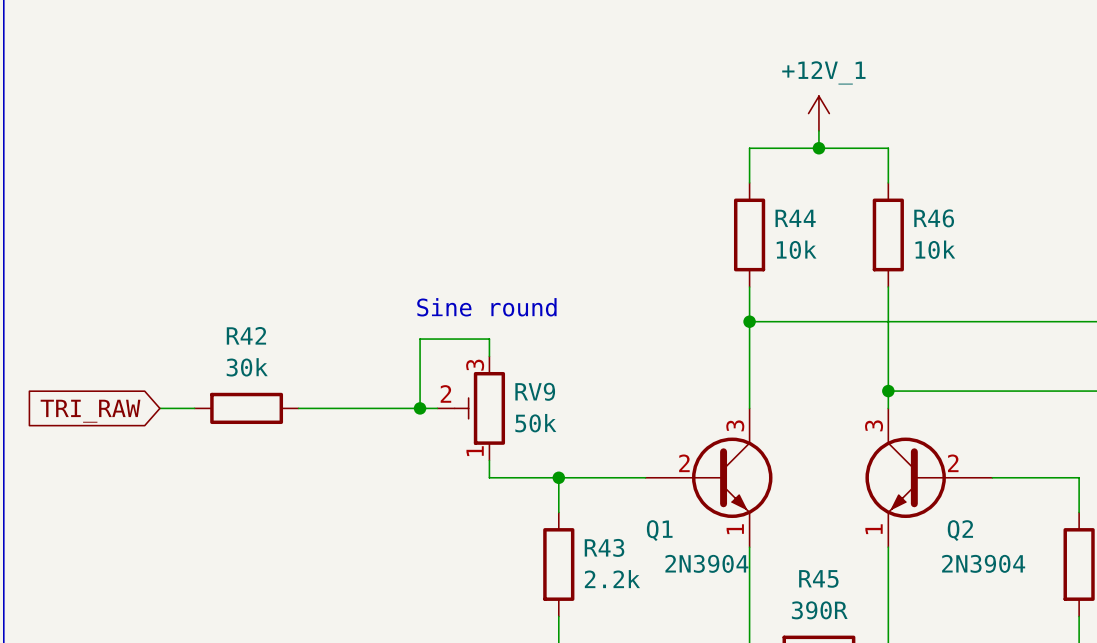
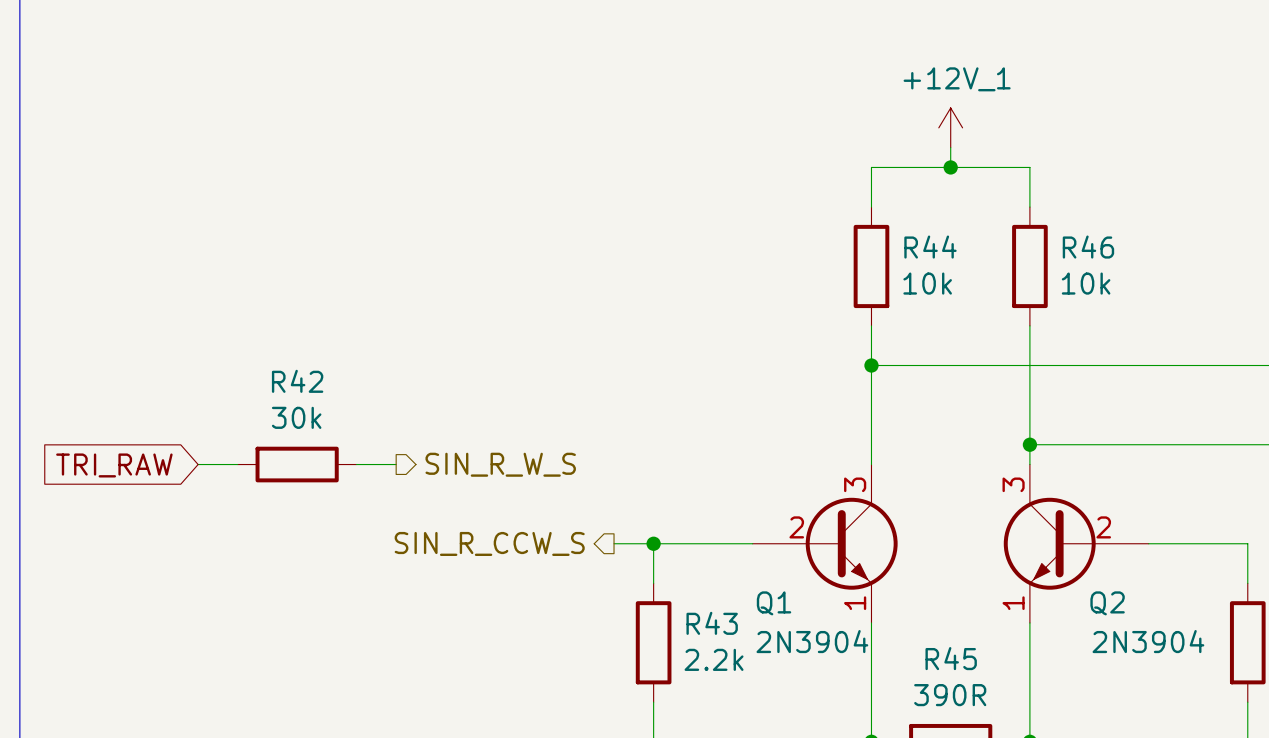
text: Sine round (486, 307) -> none
wire: (489, 356) (489, 339) (420, 339) (420, 408) -> none
wire: (333, 408) (437, 408) -> none
junction: (420, 408) -> none
RV9: 50k (471, 408) -> none
hierarchical label: none -> SIN_R_W_S (500, 464)
wire: (489, 460) (489, 477) (524, 477) -> none
hierarchical label: none -> SIN_R_CCW_S (489, 543)

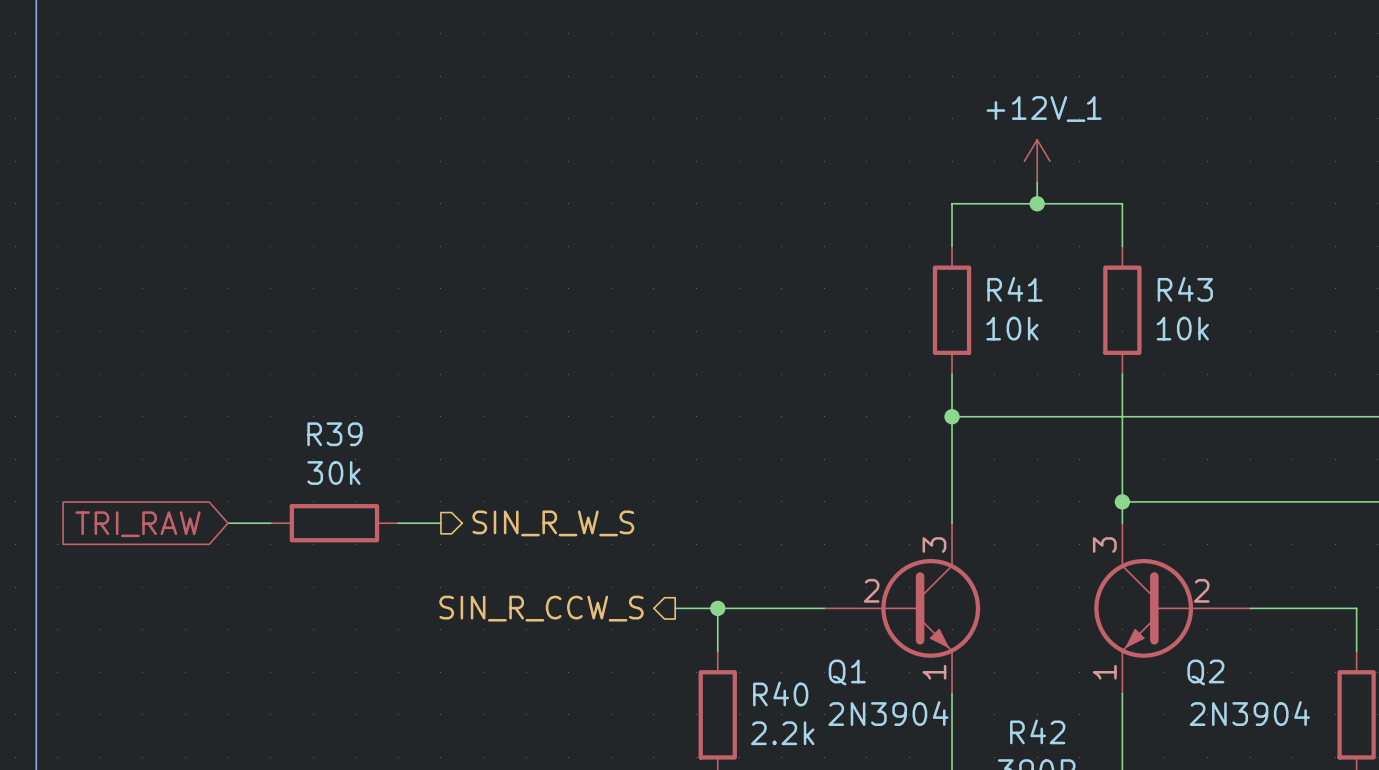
R44 name: R44 (930, 247) -> R41 (1014, 289)
R46 name: R46 (1088, 247) -> R43 (1185, 289)
R42 name: R42 (297, 381) -> R39 (334, 434)
R43 name: R43 (712, 623) -> R40 (780, 693)
R45 name: R45 (951, 658) -> R42 (1037, 731)

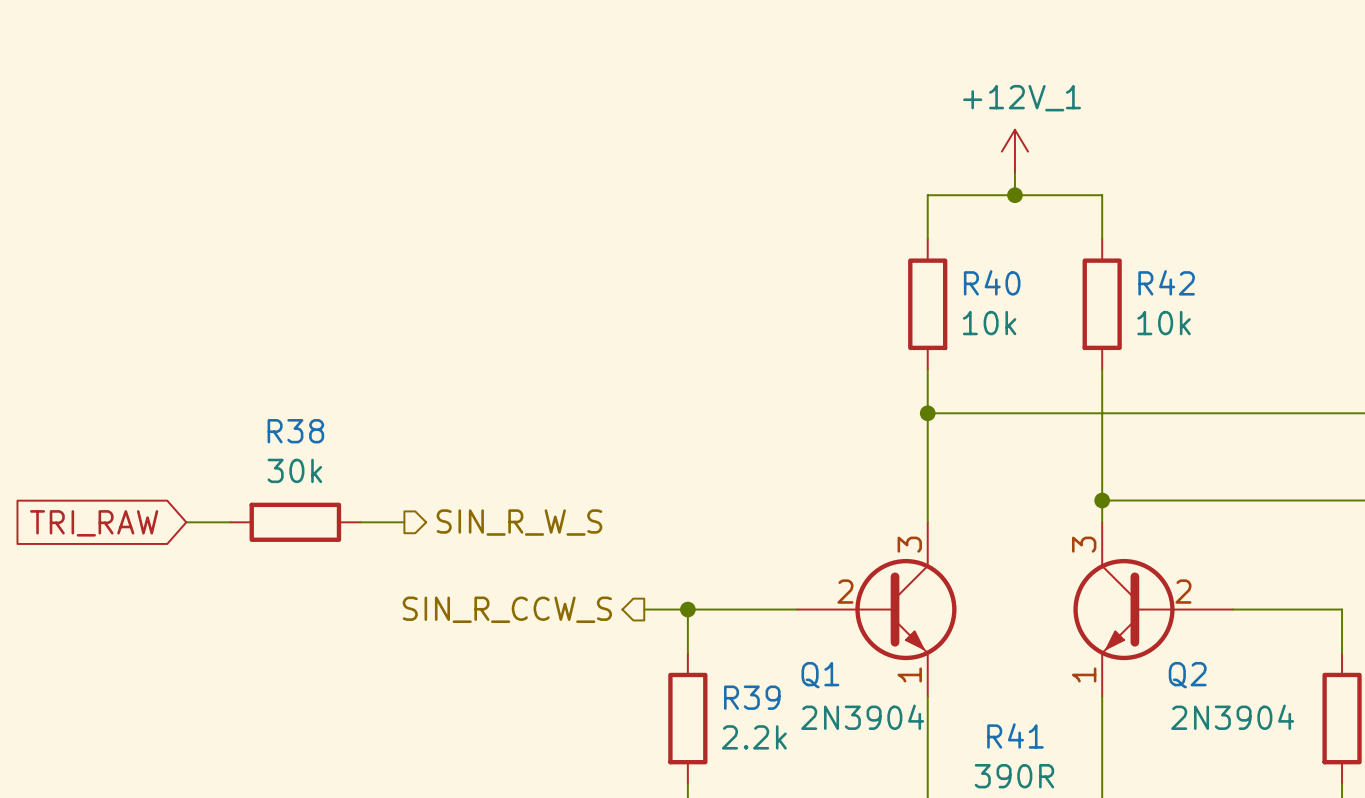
R41 name: R41 (1014, 289) -> R40 (992, 282)
R43 name: R43 (1185, 289) -> R42 (1166, 282)
R39 name: R39 (334, 434) -> R38 (295, 431)
R40 name: R40 (780, 693) -> R39 (752, 697)
R42 name: R42 (1037, 731) -> R41 (1015, 735)

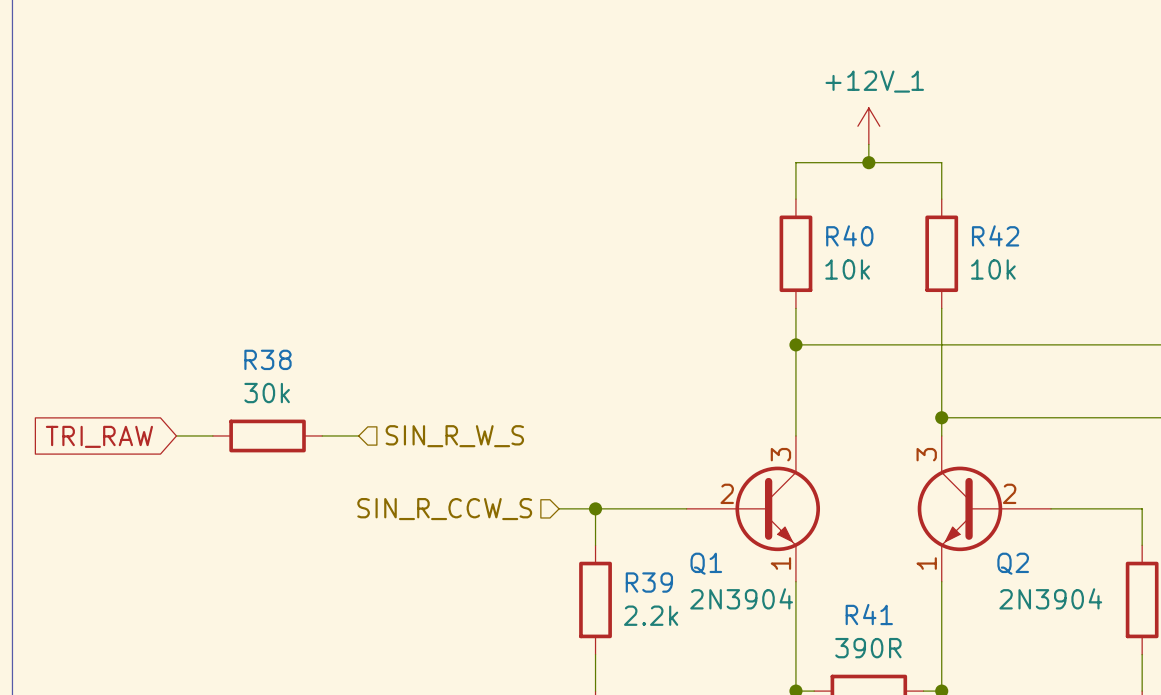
hierarchical label shape: output (519, 522) -> input (454, 436)
hierarchical label shape: output (507, 609) -> input (444, 509)

